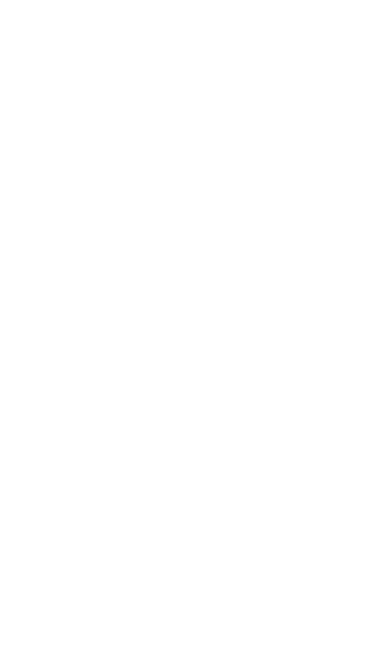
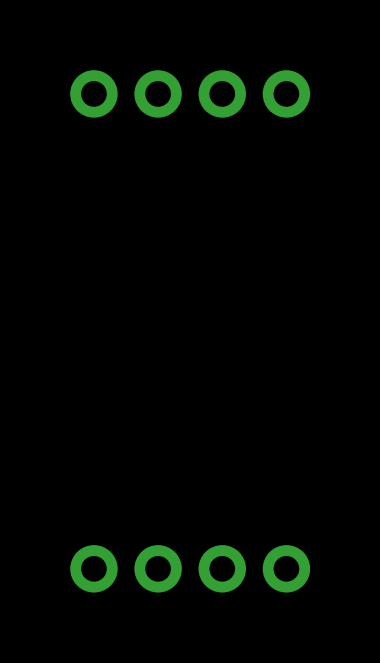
part: none -> (190, 93)
part: none -> (190, 568)

